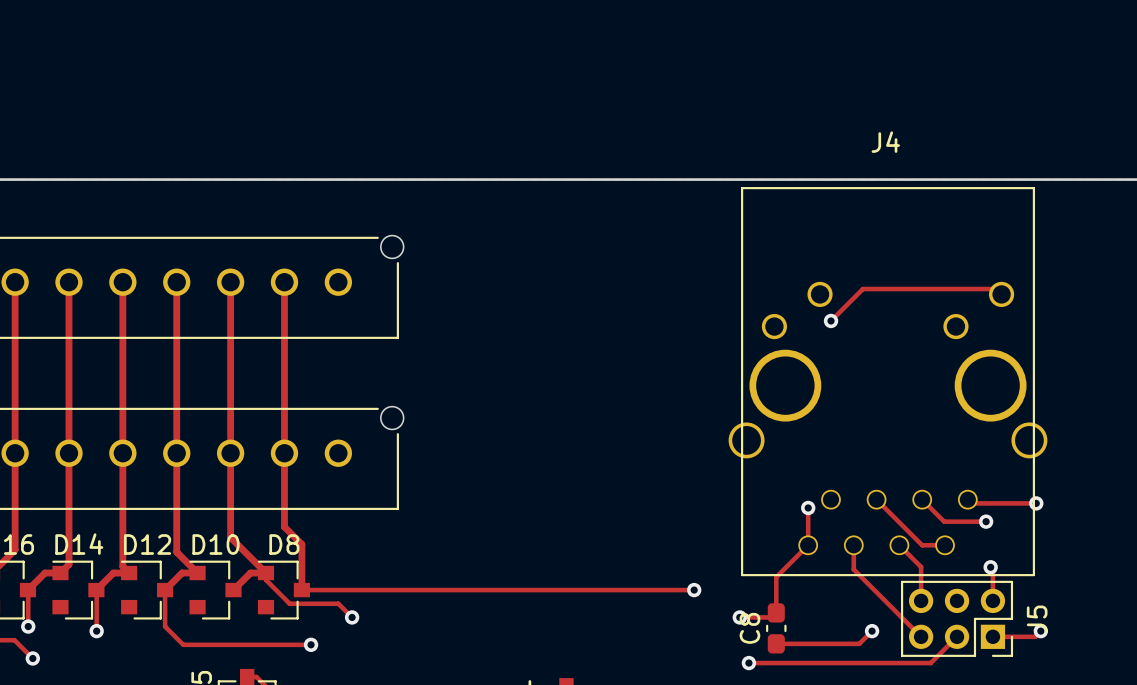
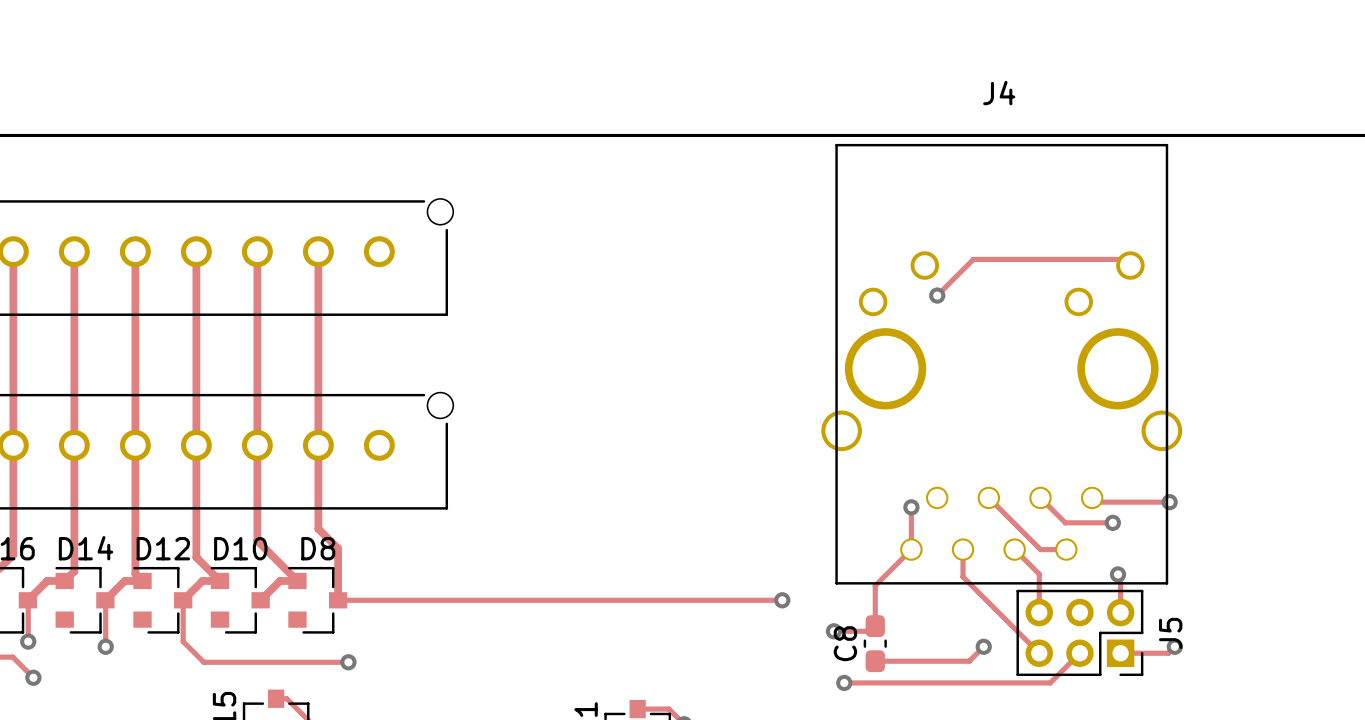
track: (266, 573) (266, 579) (289, 603) (338, 603) (352, 617) -> none
via: (352, 617) -> none

